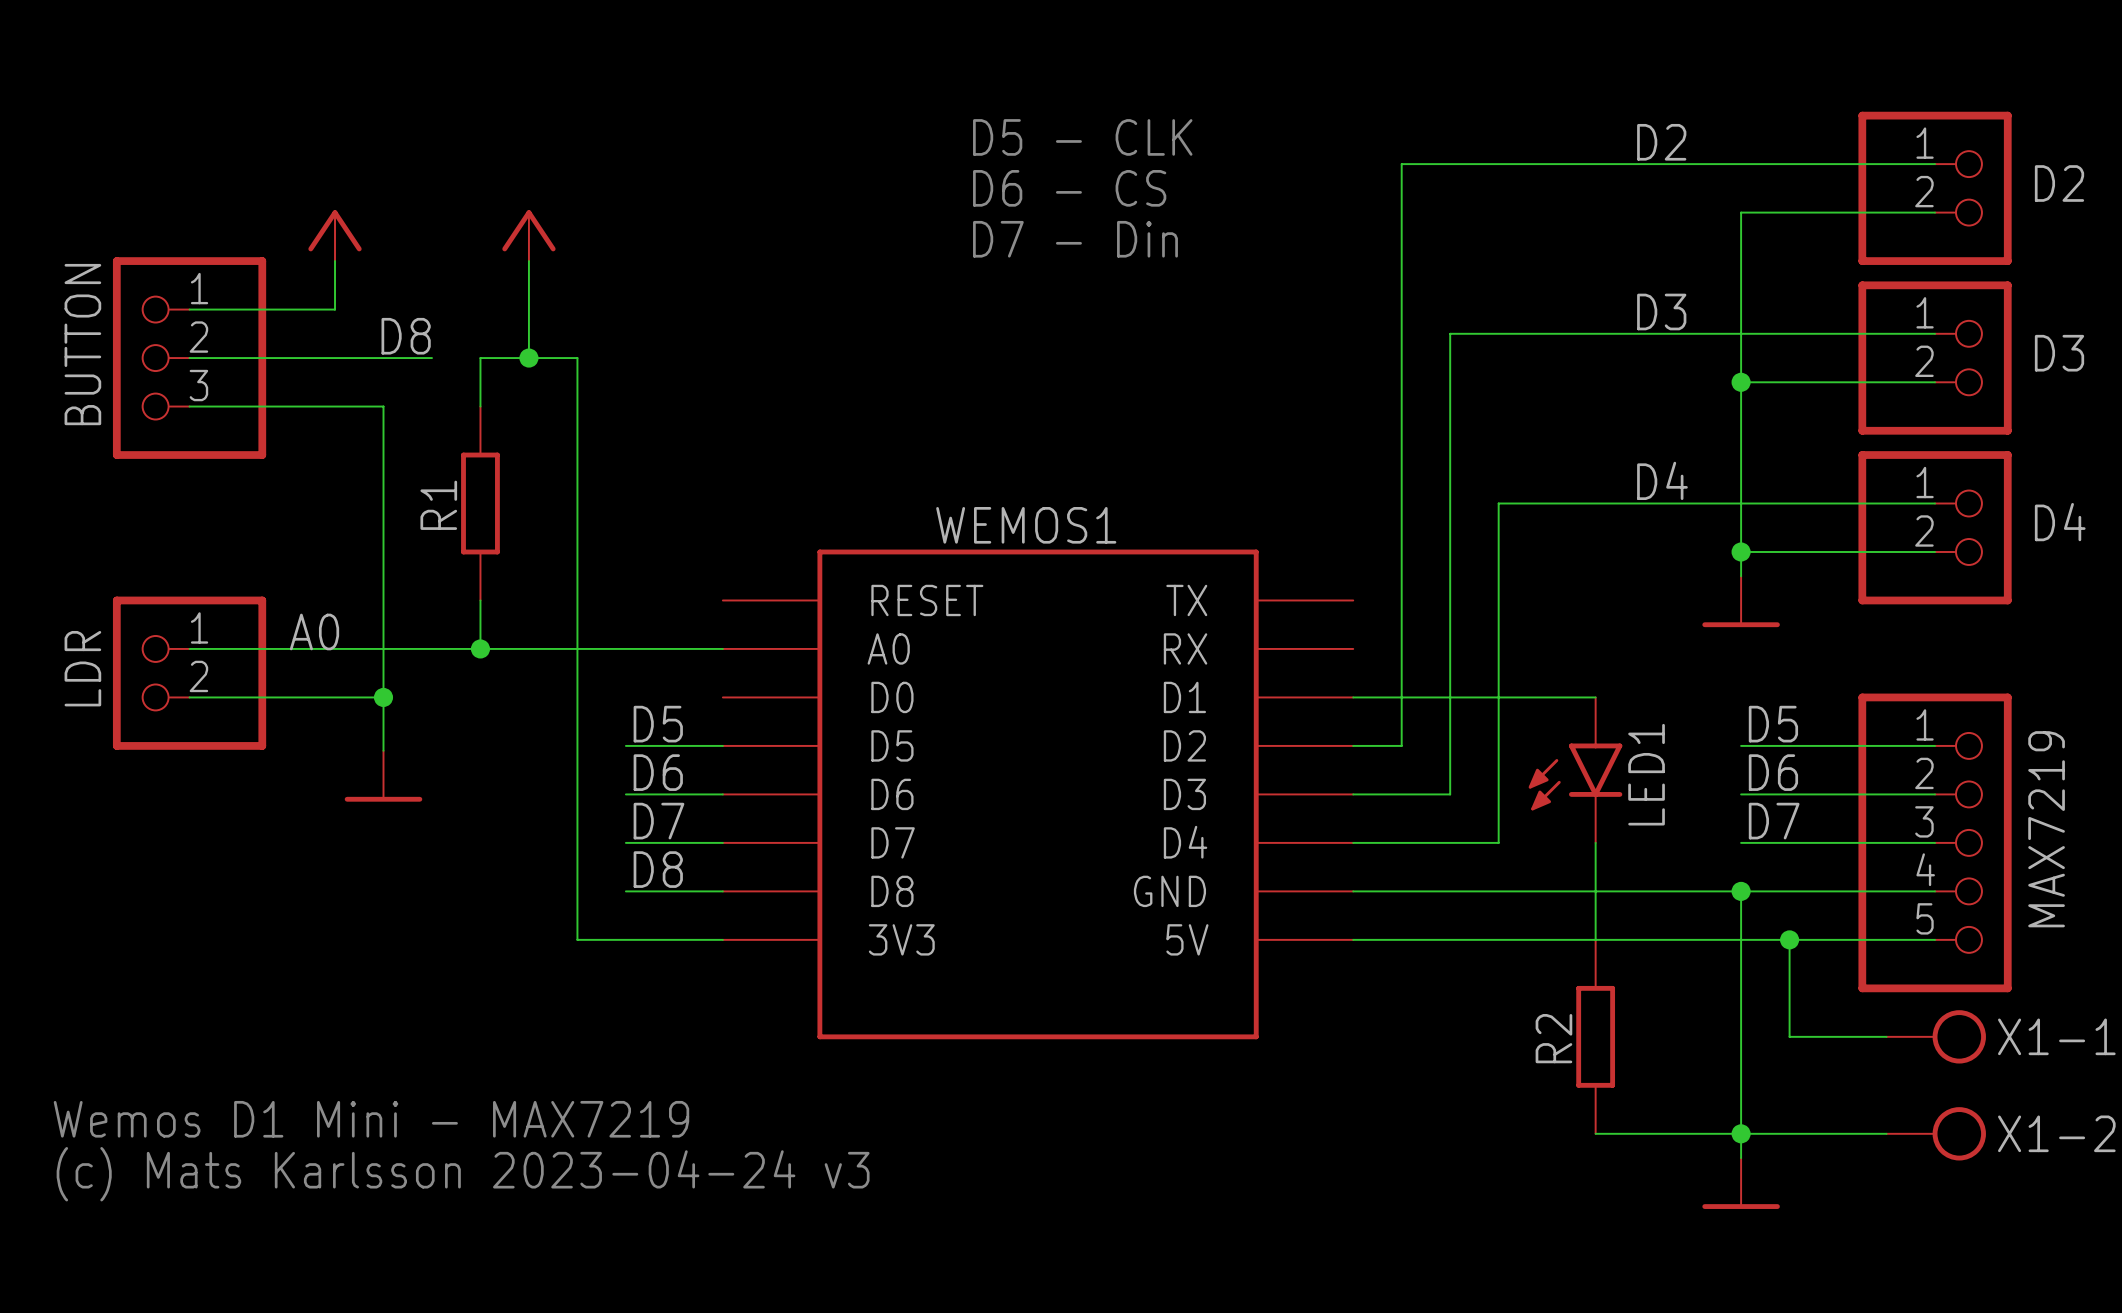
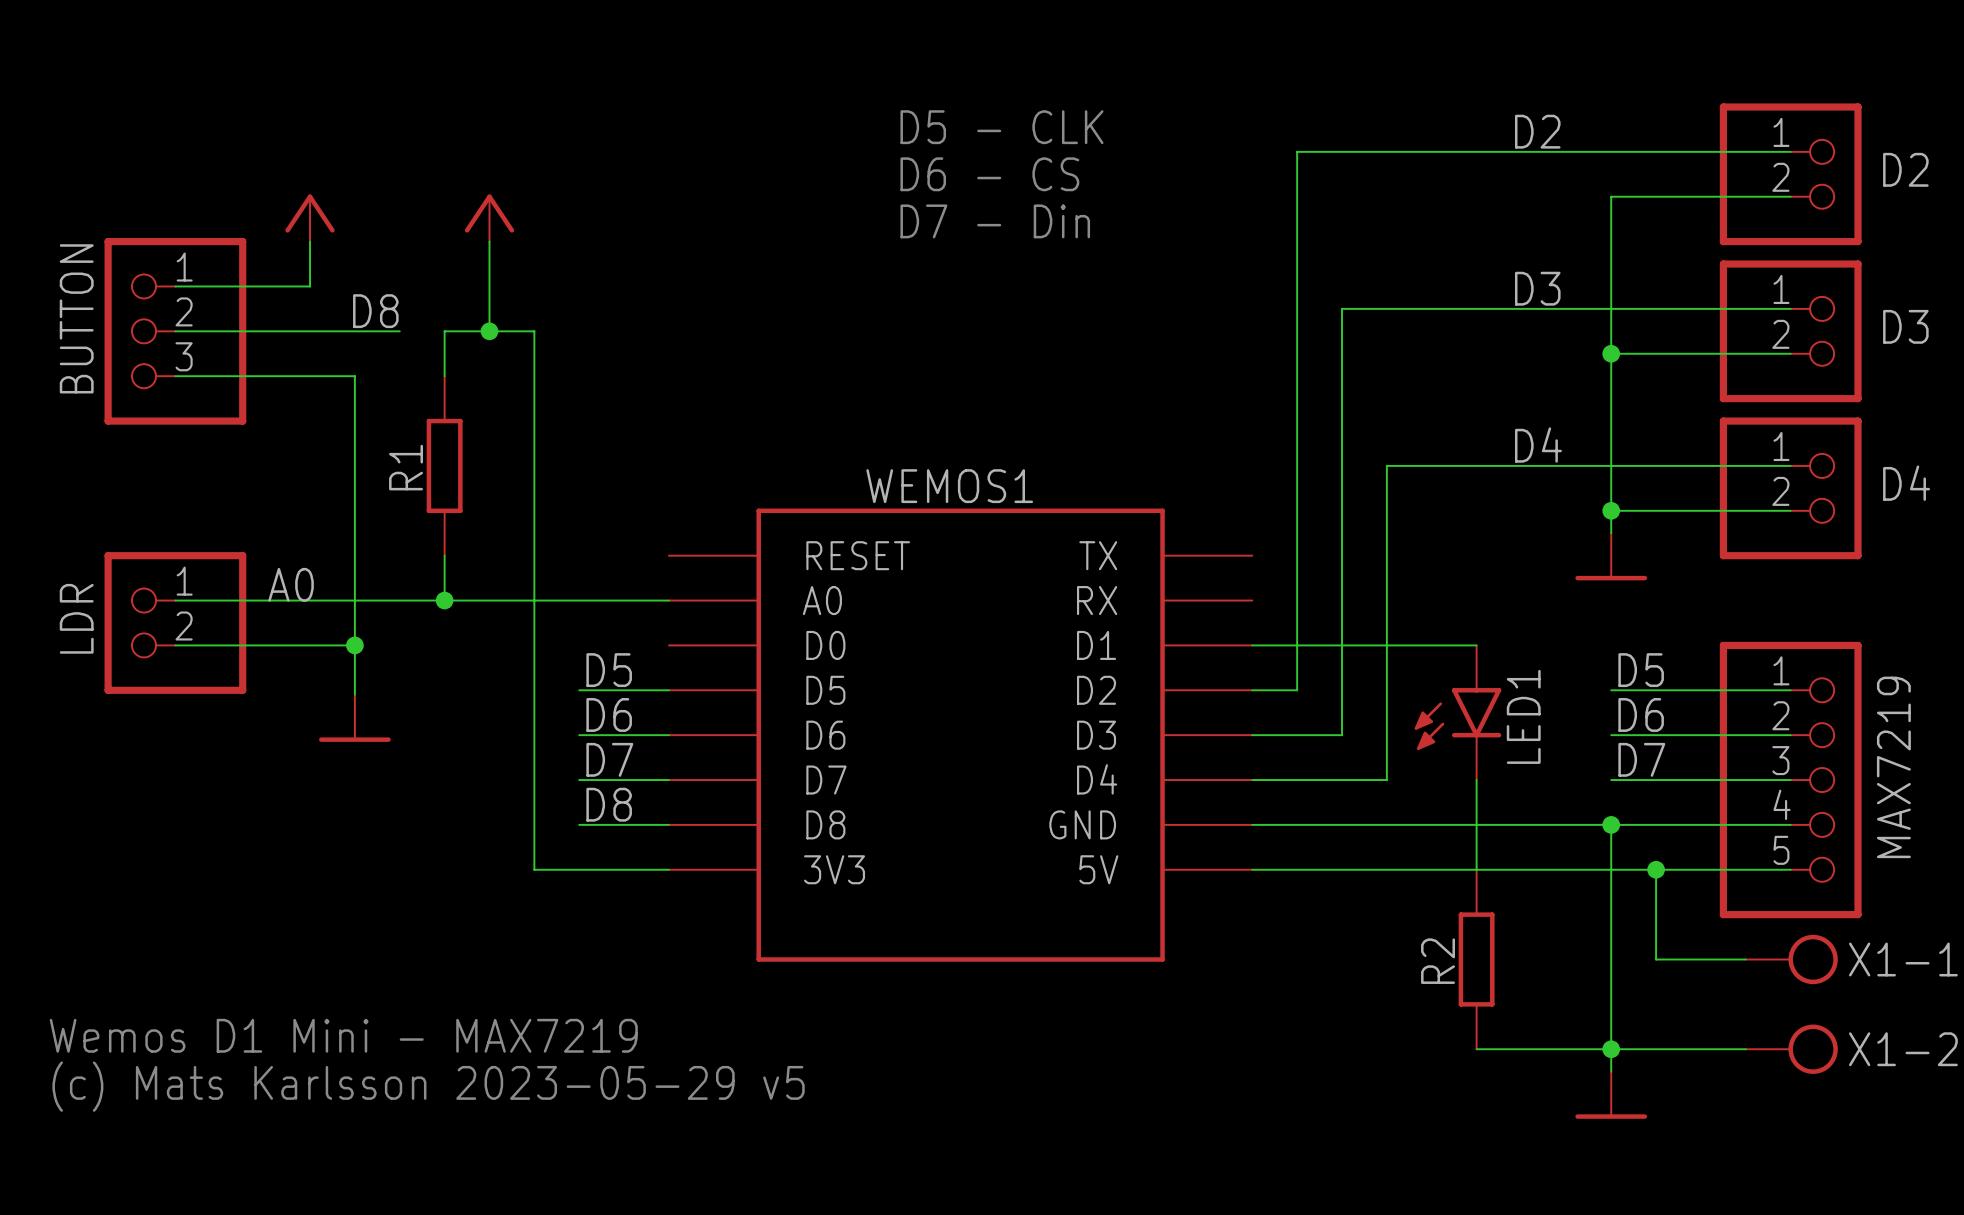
text: (c) Mats Karlsson 2023-04-24 v3 (463, 1174) -> (c) Mats Karlsson 2023-05-29 v5 (428, 1086)

